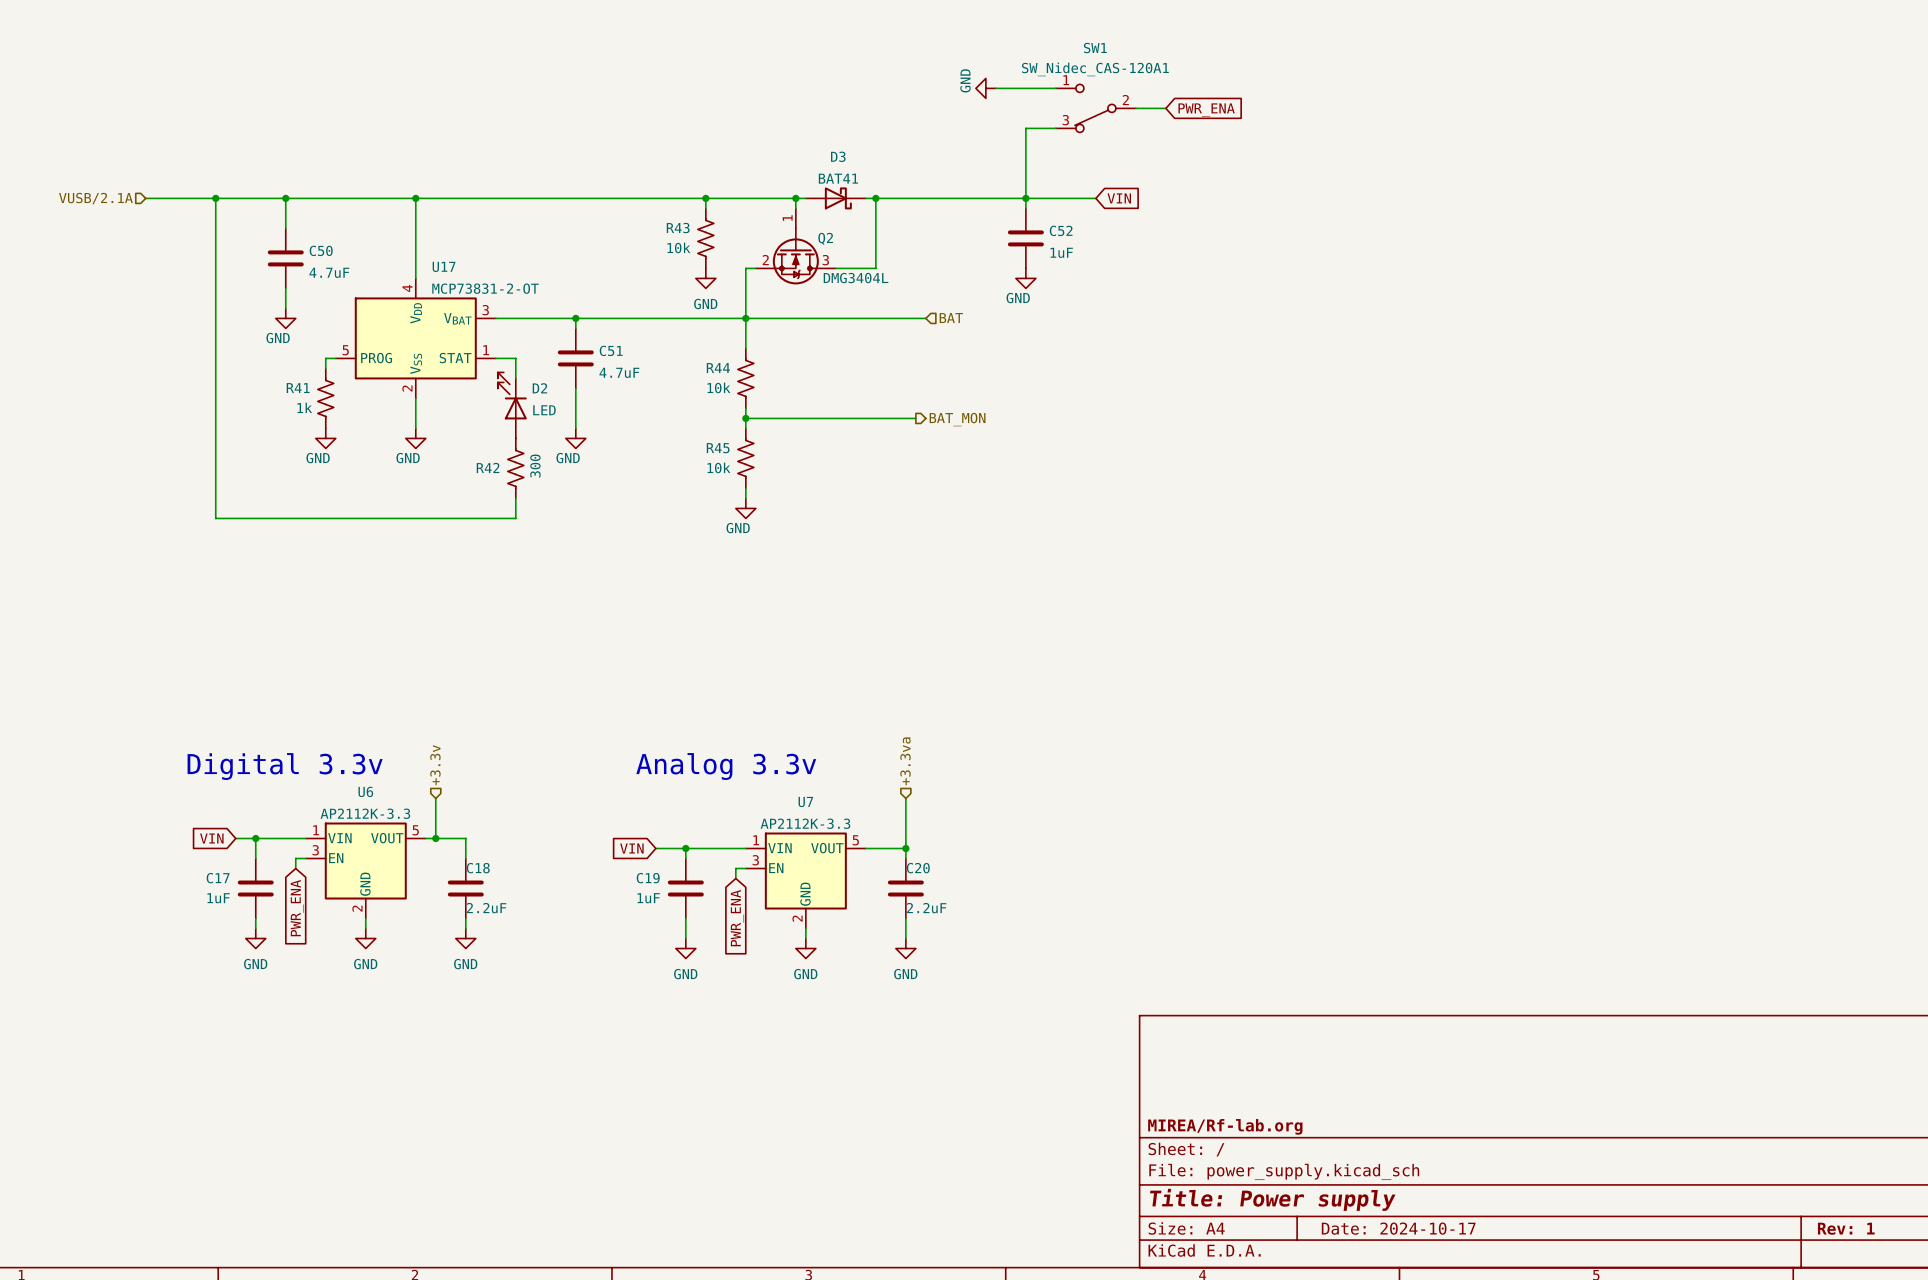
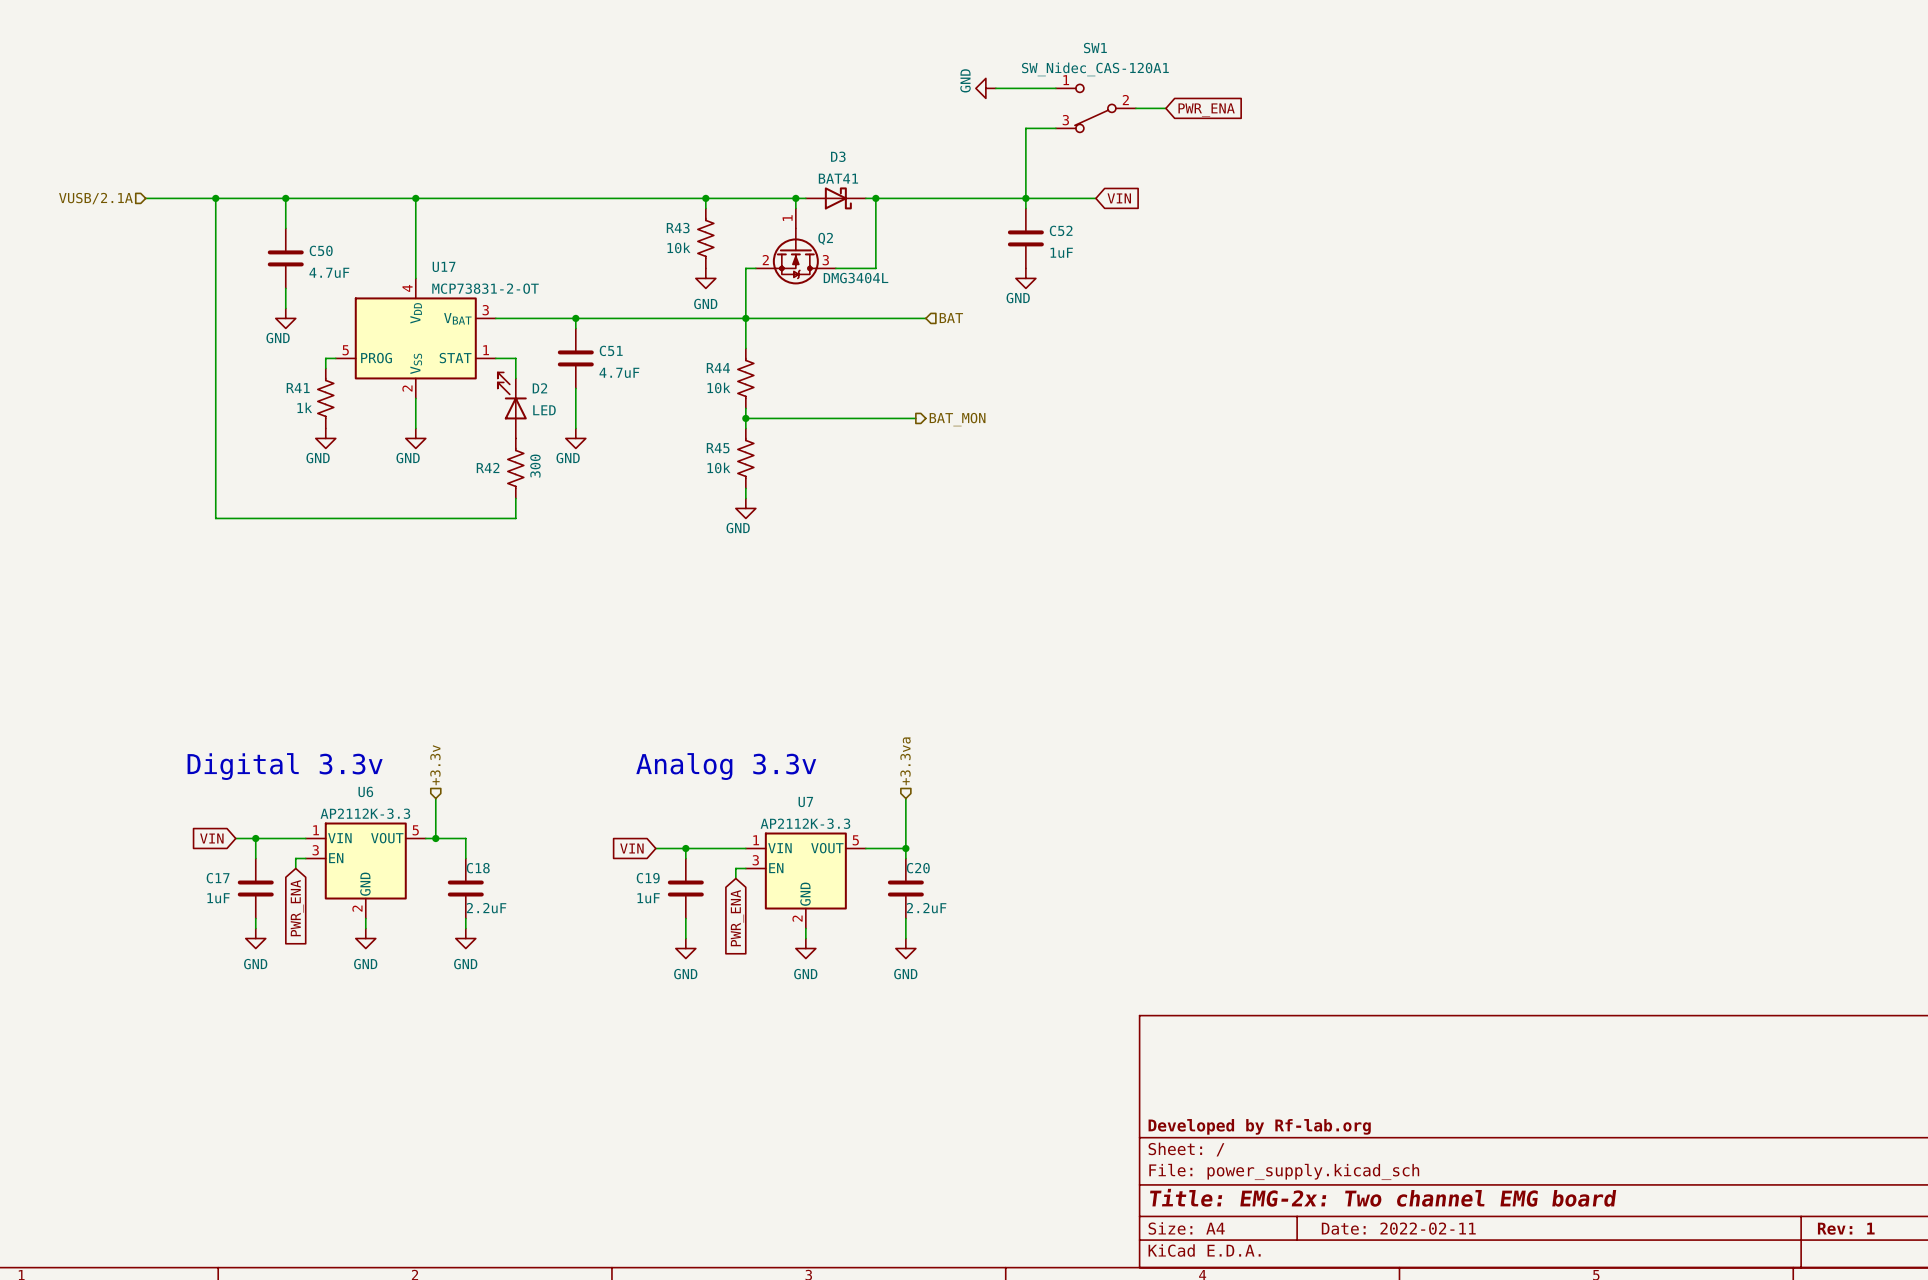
title block: MIREA/Rf-lab.org (1225, 1126) -> Developed by Rf-lab.org (1259, 1126)
title block: Title: Power supply (1272, 1199) -> Title: EMG-2x: Two channel EMG board (1383, 1197)
title block: Date: 2024-10-17 (1398, 1228) -> Date: 2022-02-11 (1398, 1228)

